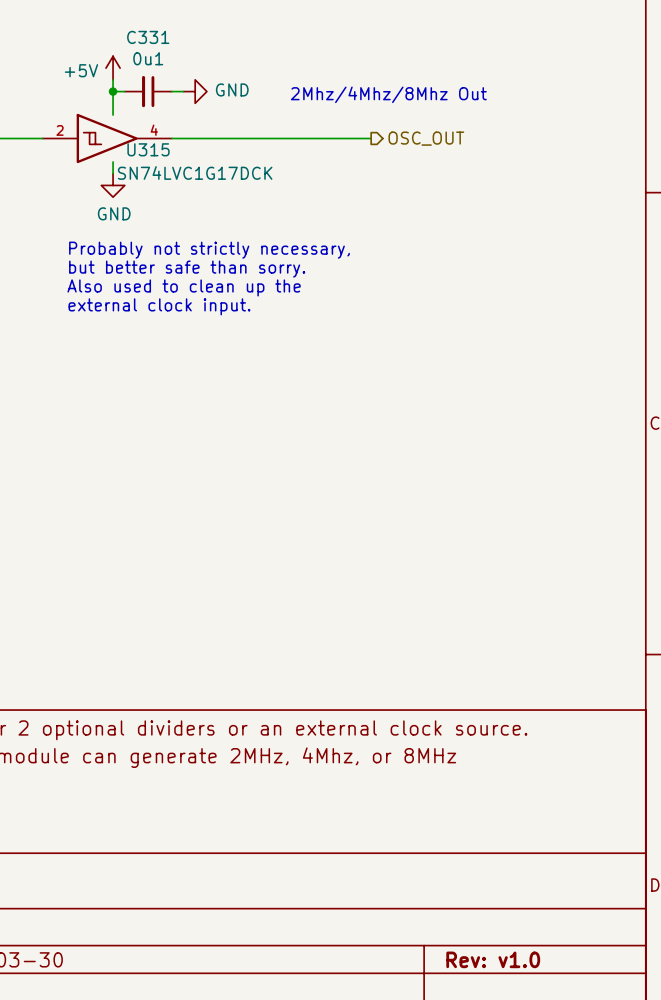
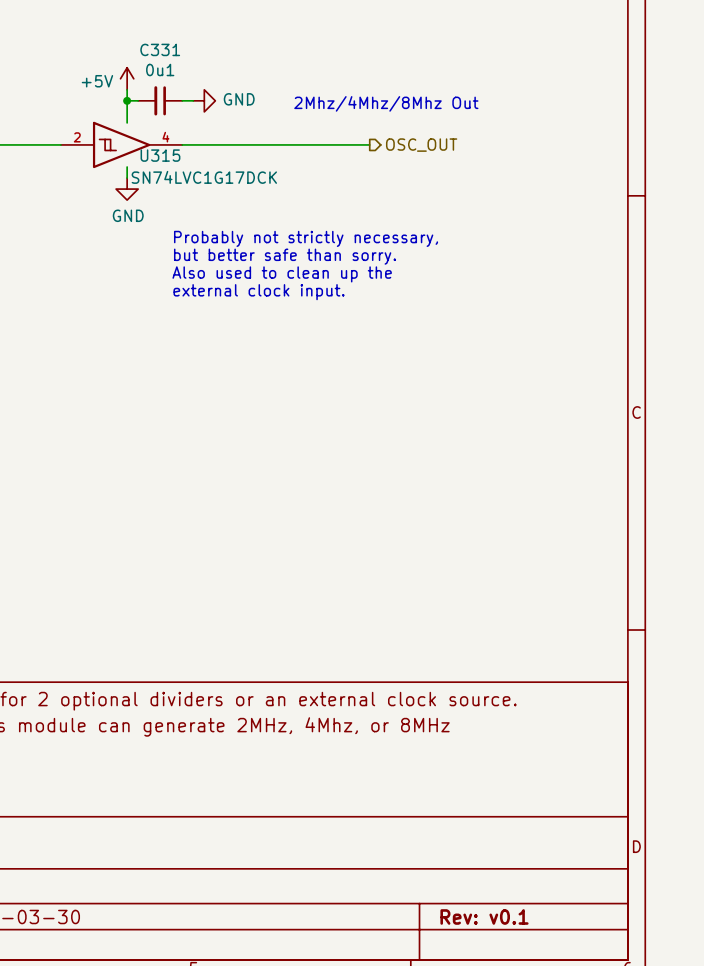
text position: Probably not strictly necessary, (209, 250) -> Probably not strictly necessary, (306, 238)
text position: but better safe than sorry. (187, 269) -> but better safe than sorry. (285, 256)
text position: Also used to clean up the (184, 287) -> Also used to clean up the (282, 274)
text position: external clock input. (159, 306) -> external clock input. (259, 292)
title block: Rev: v1.0 (493, 959) -> Rev: v0.1 (484, 916)

